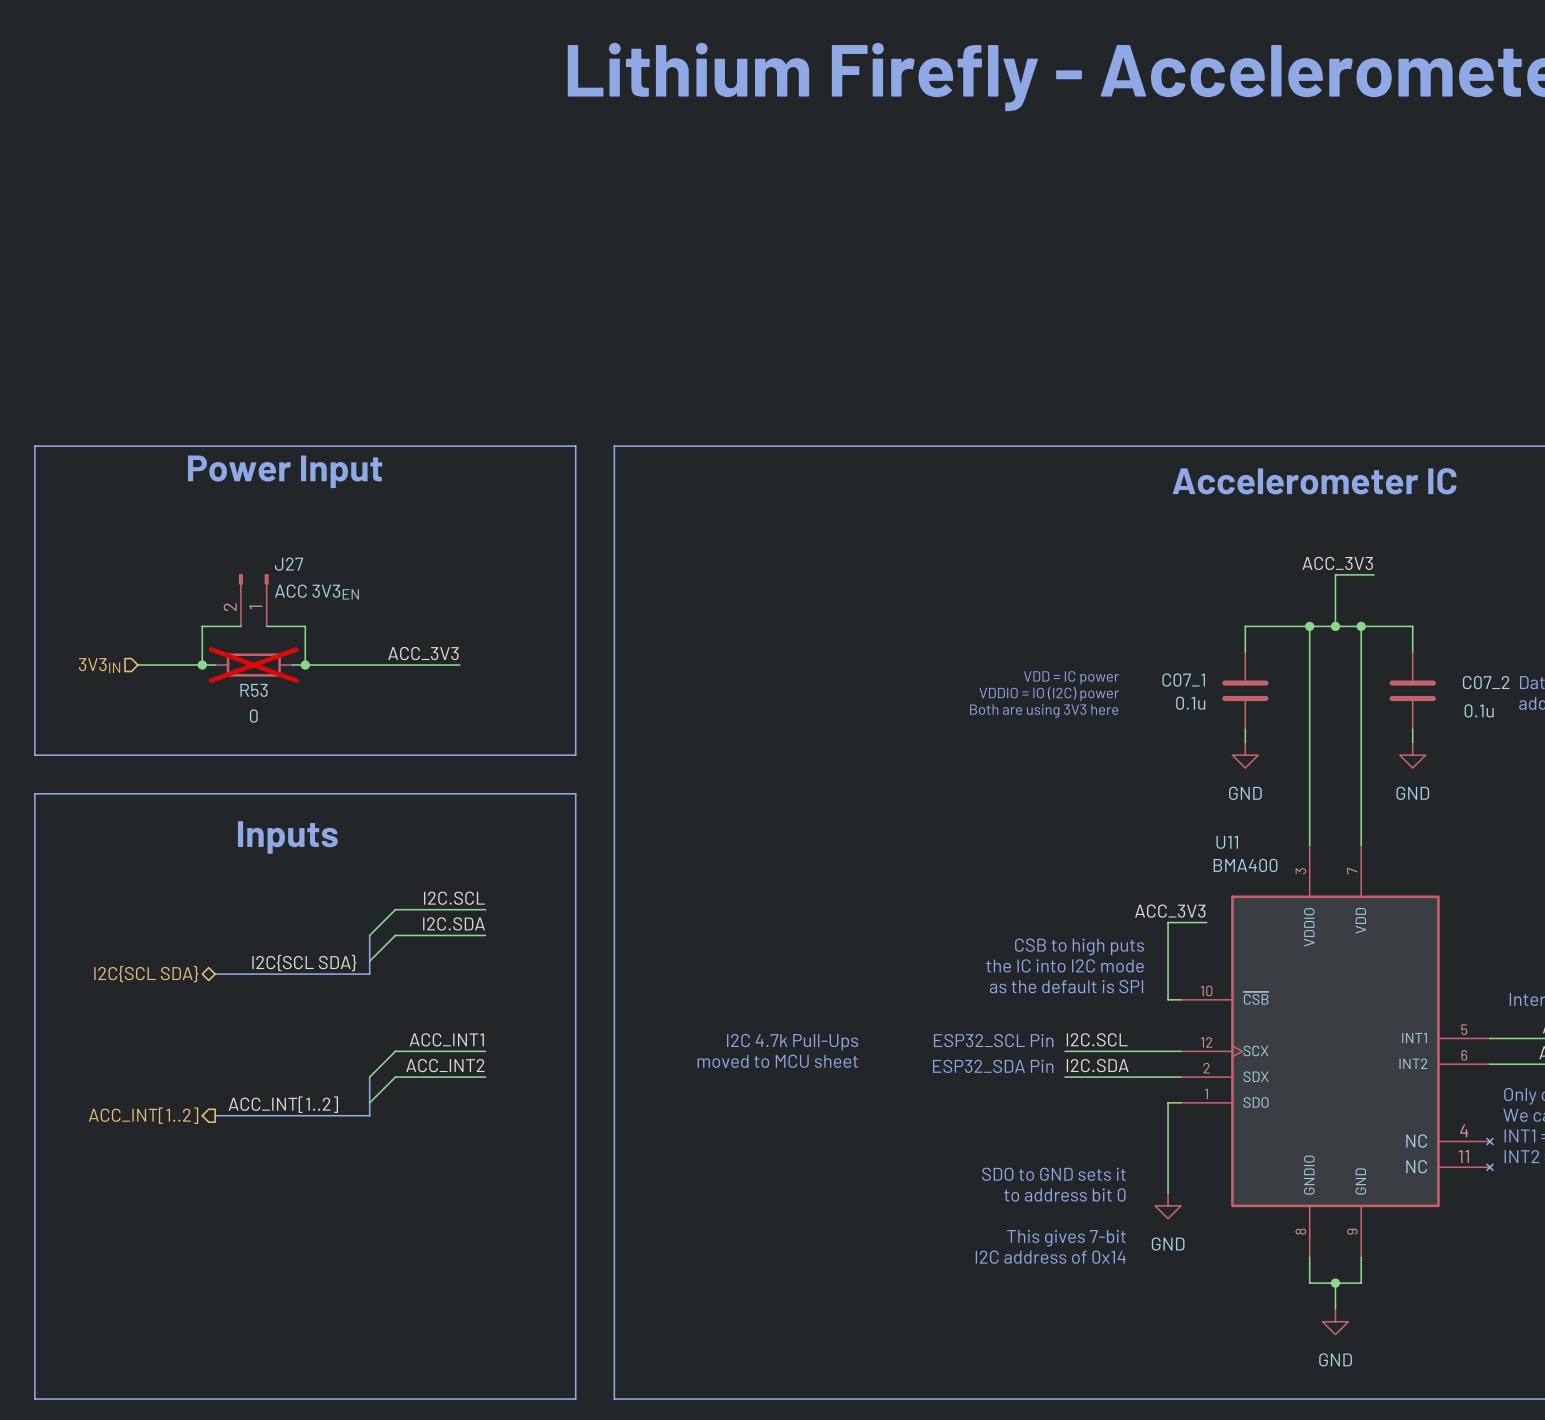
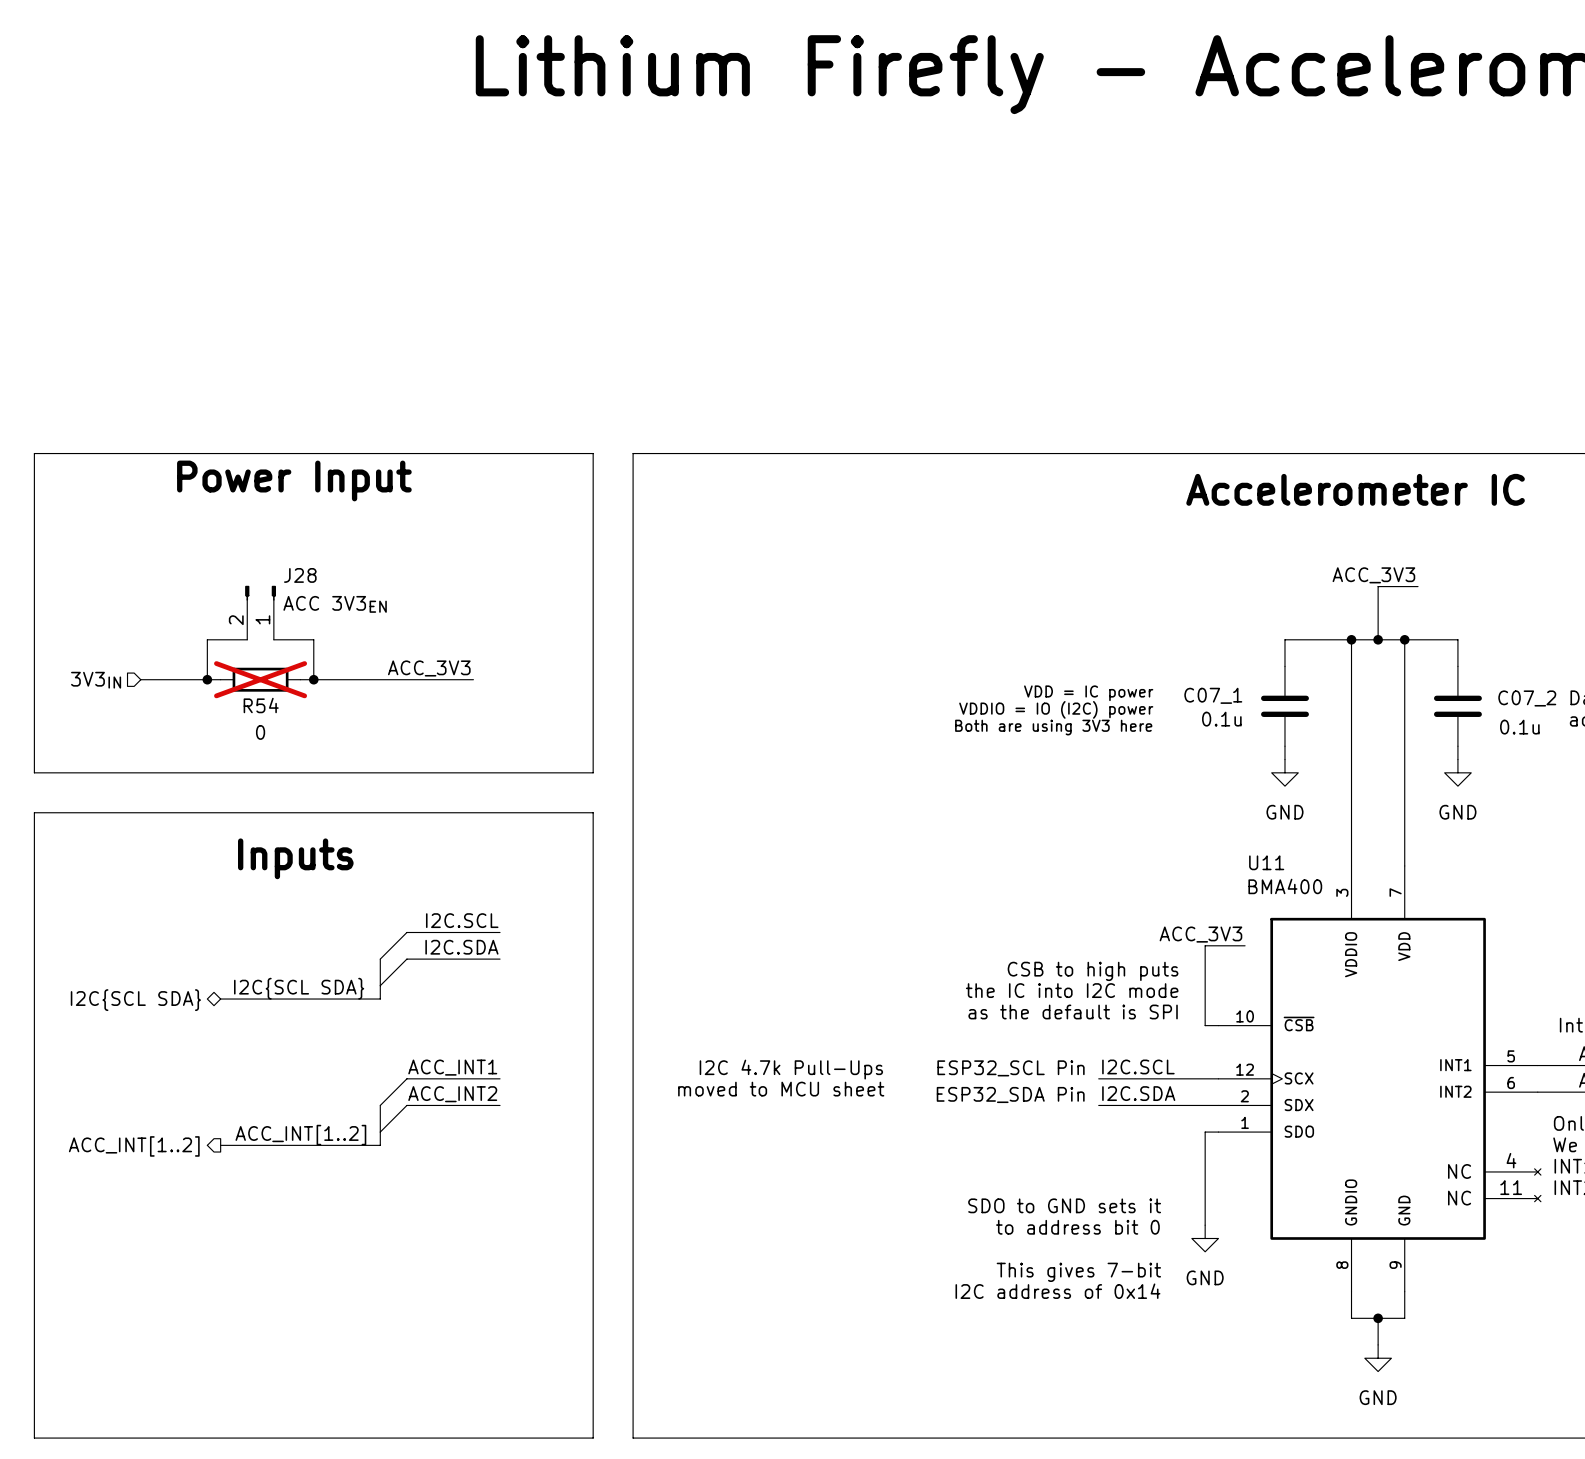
J27 name: J27 (289, 564) -> J28 (300, 575)
R53 name: R53 (254, 690) -> R54 (261, 705)

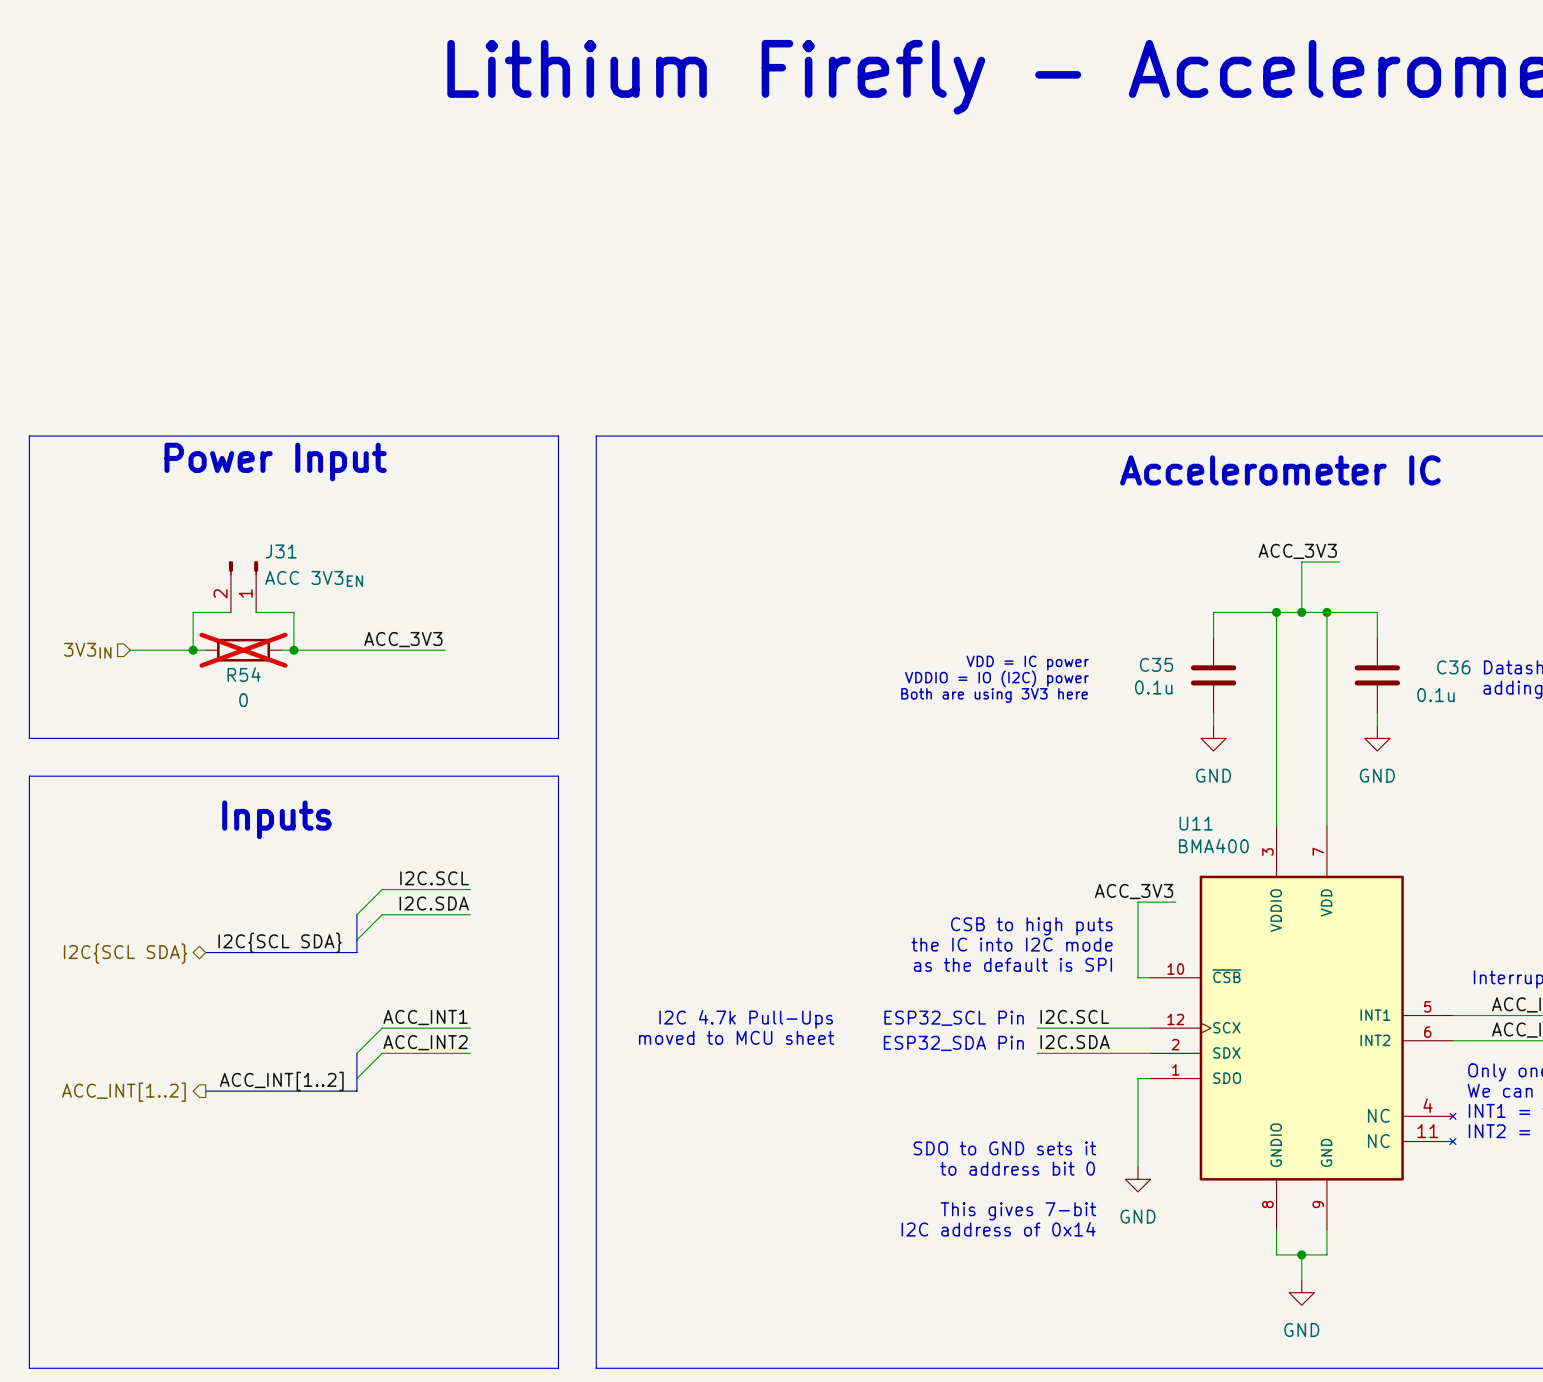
J28 name: J28 (300, 575) -> J31 (281, 551)
C07_1 name: C07_1 (1213, 695) -> C35 (1156, 664)
C07_2 name: C07_2 (1527, 698) -> C36 (1453, 667)

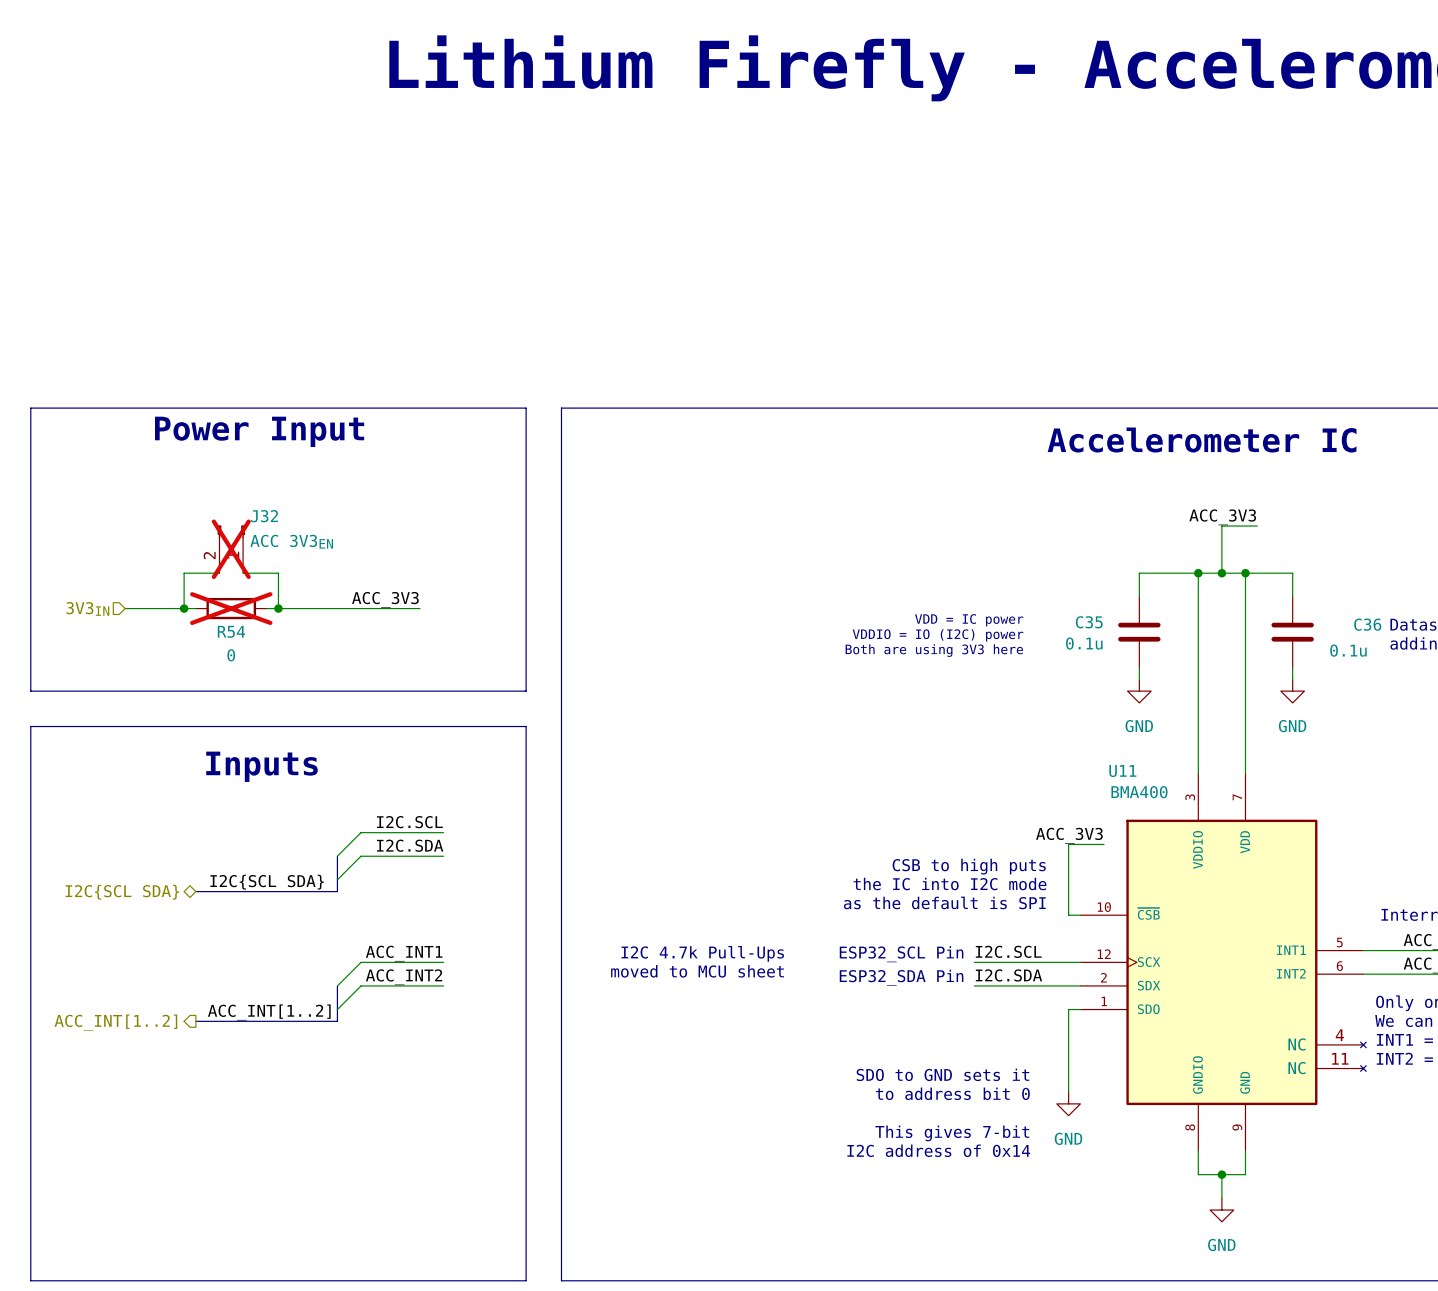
J31 name: J31 (281, 551) -> J32 (264, 516)
J31 do-not-place cross: none -> (231, 549)

